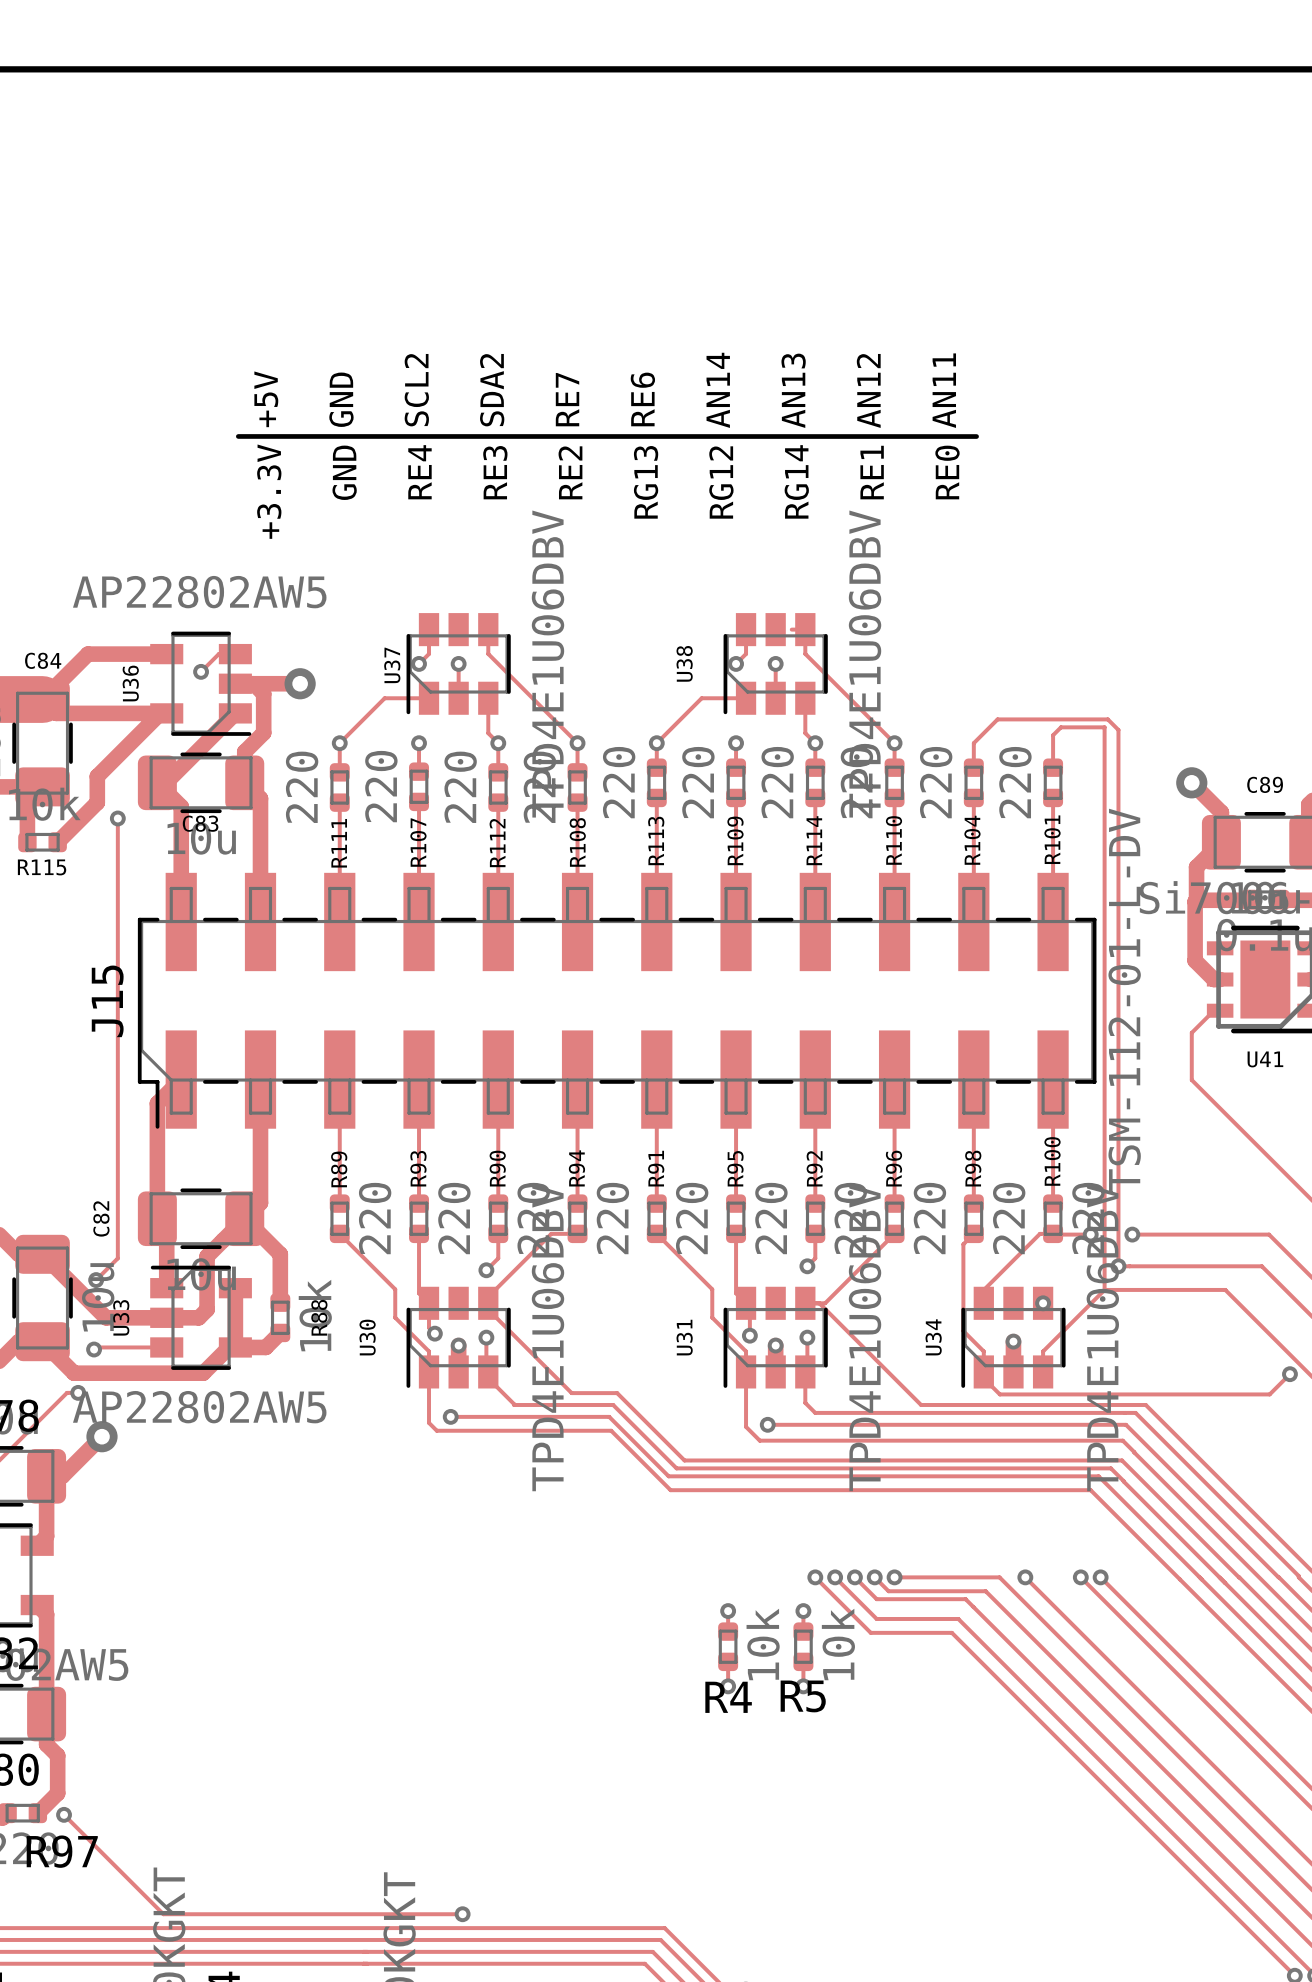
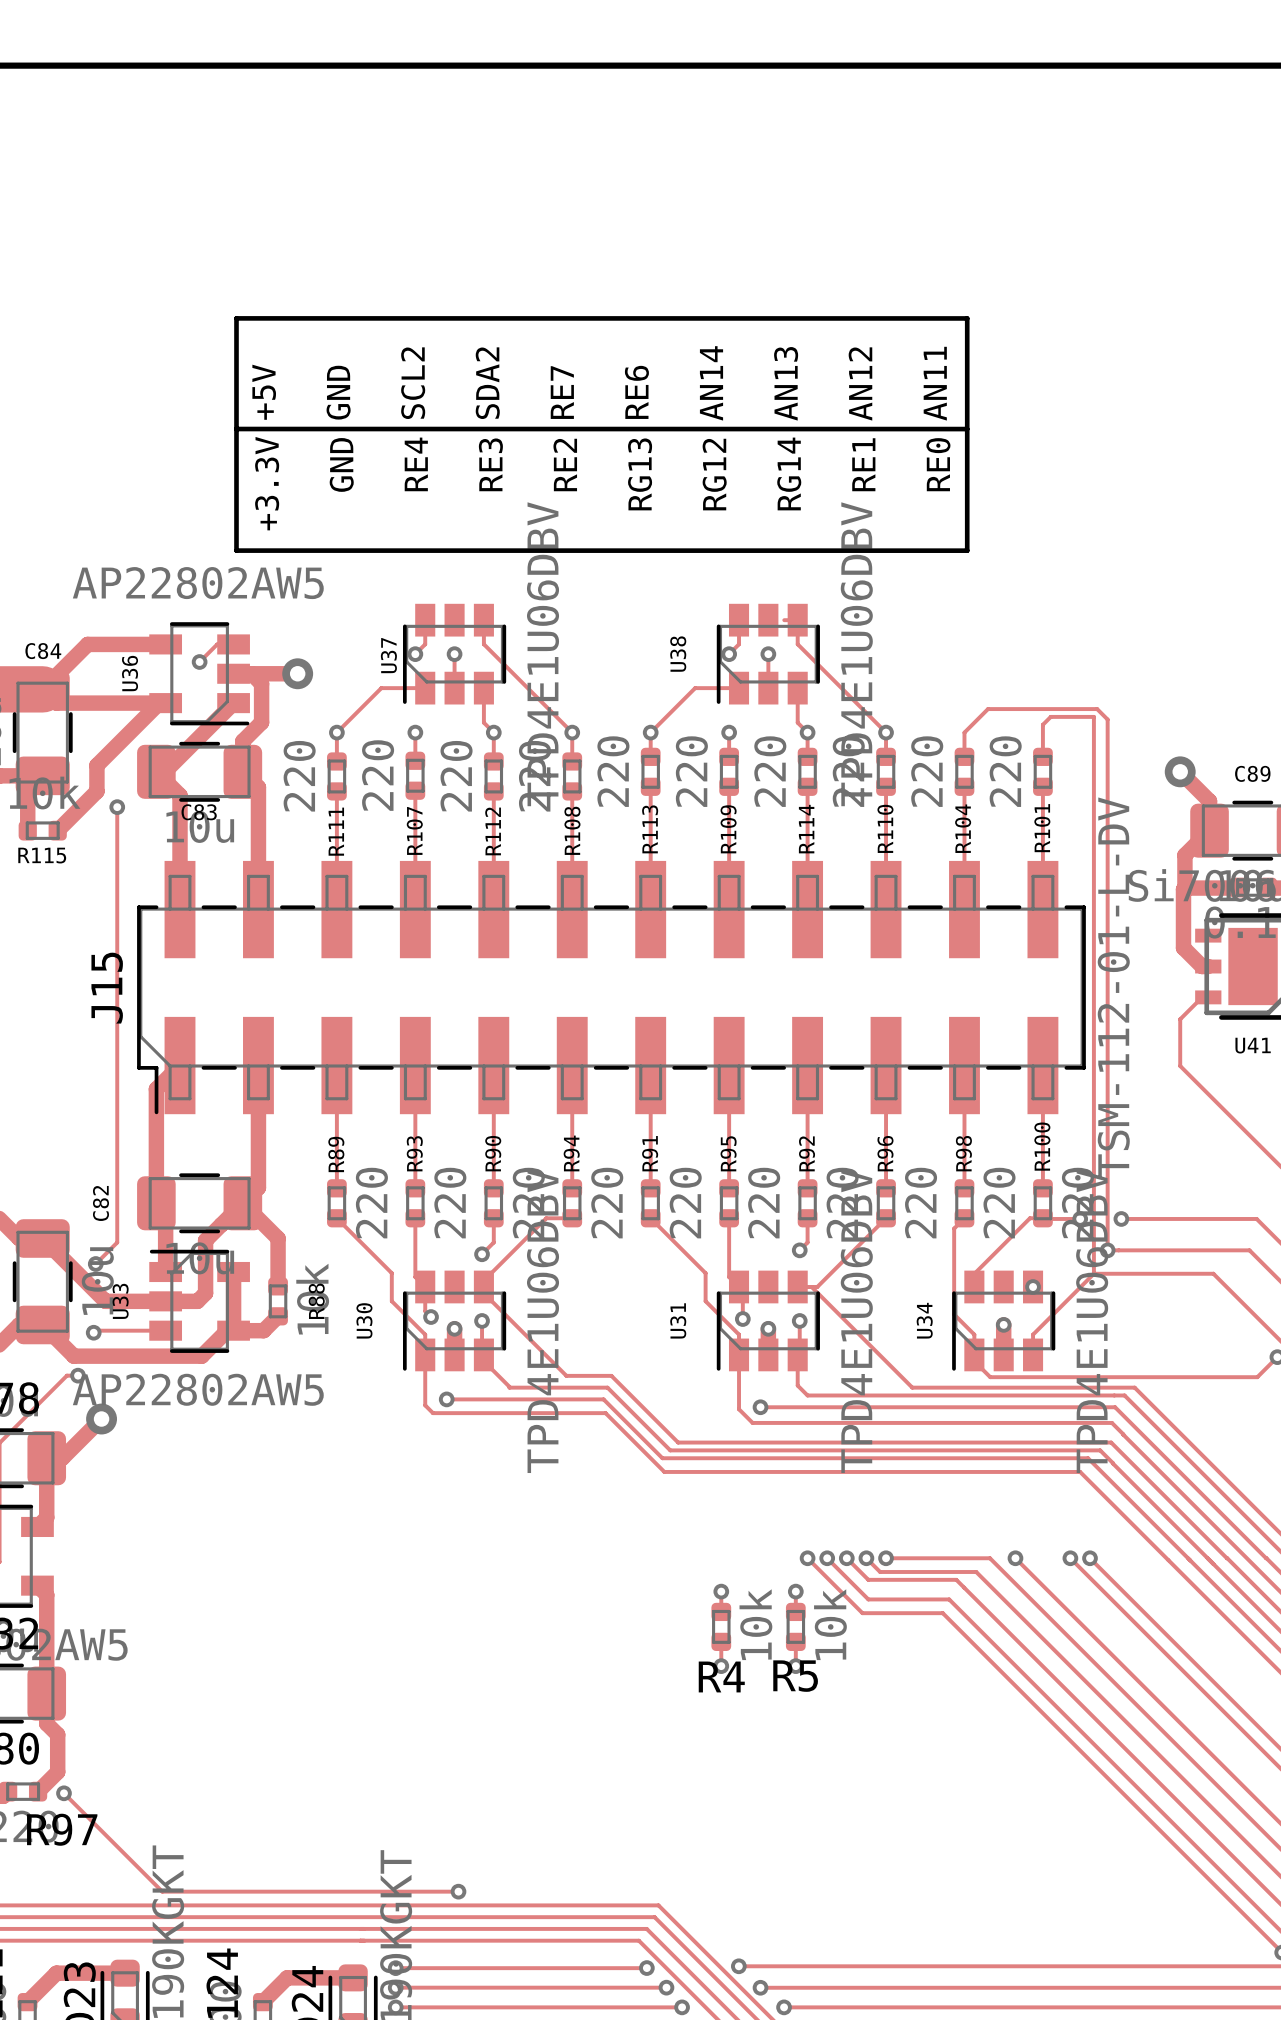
line: none -> (236, 318) (967, 318) (967, 550) (236, 550) (236, 318)

